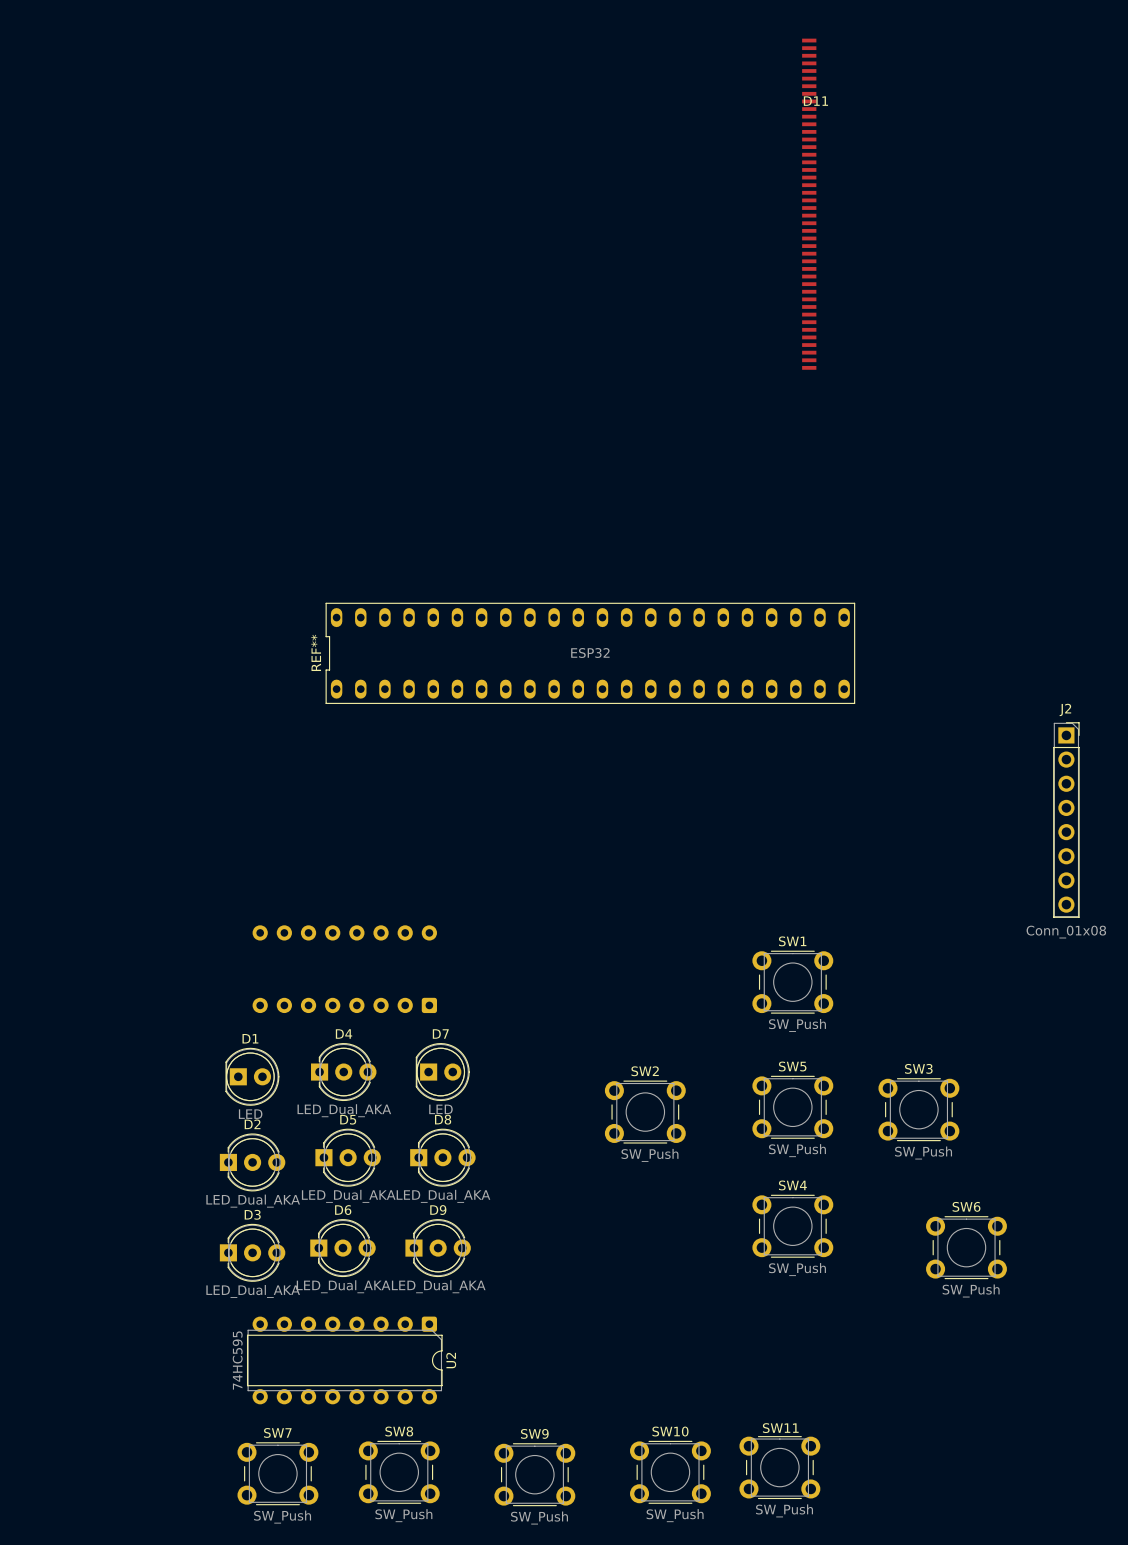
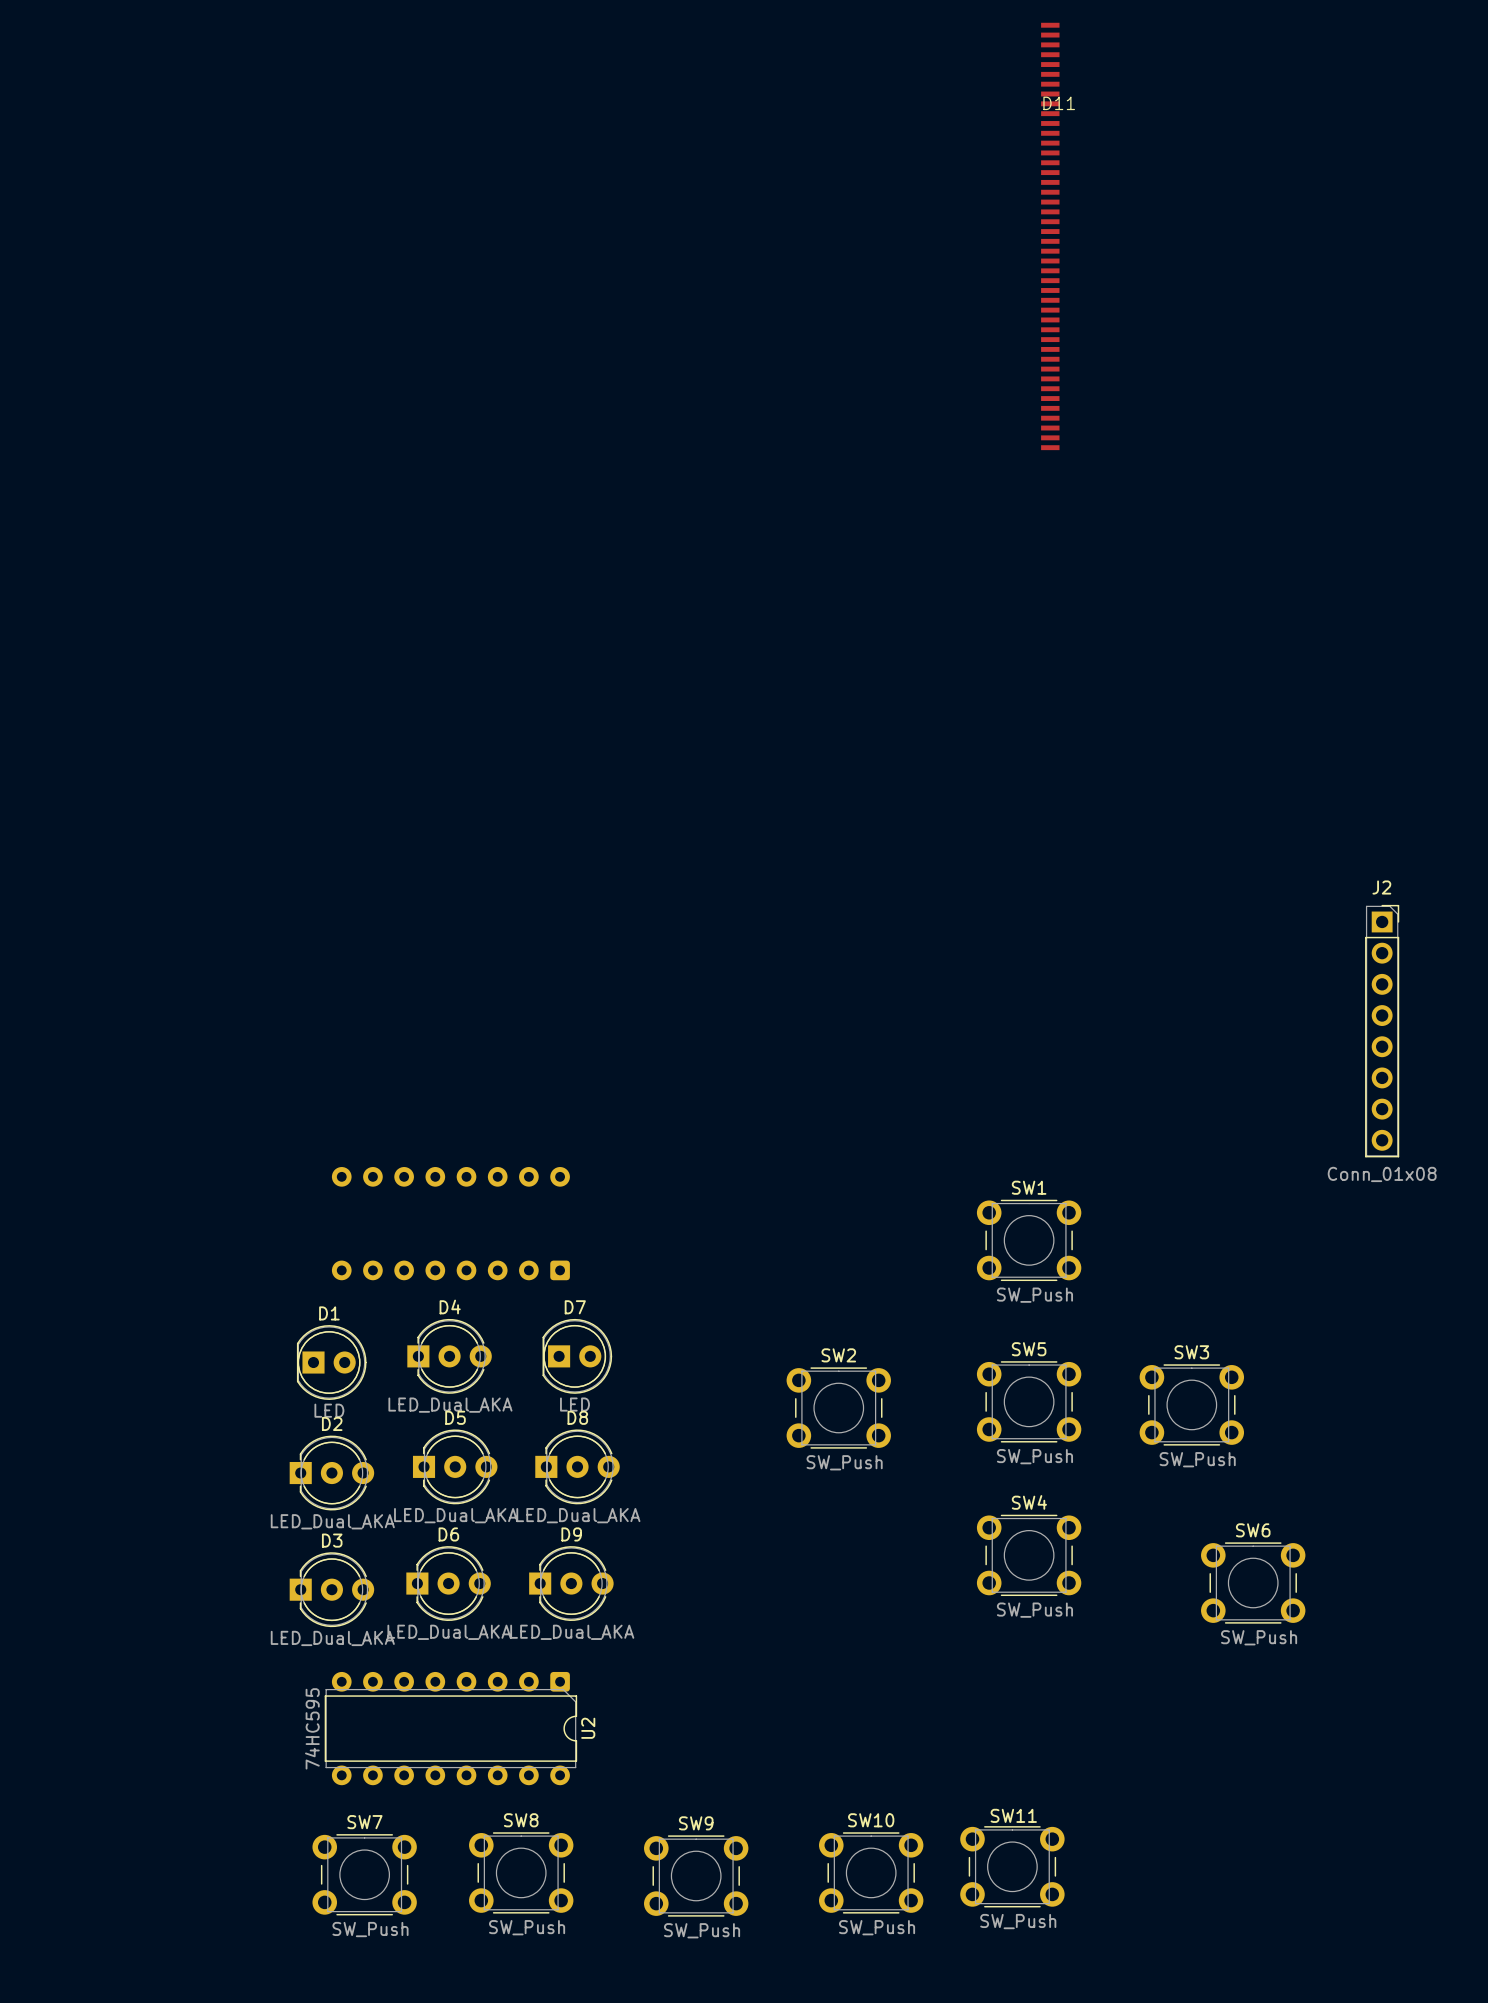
REF**: ESP32 (590, 653) -> none

